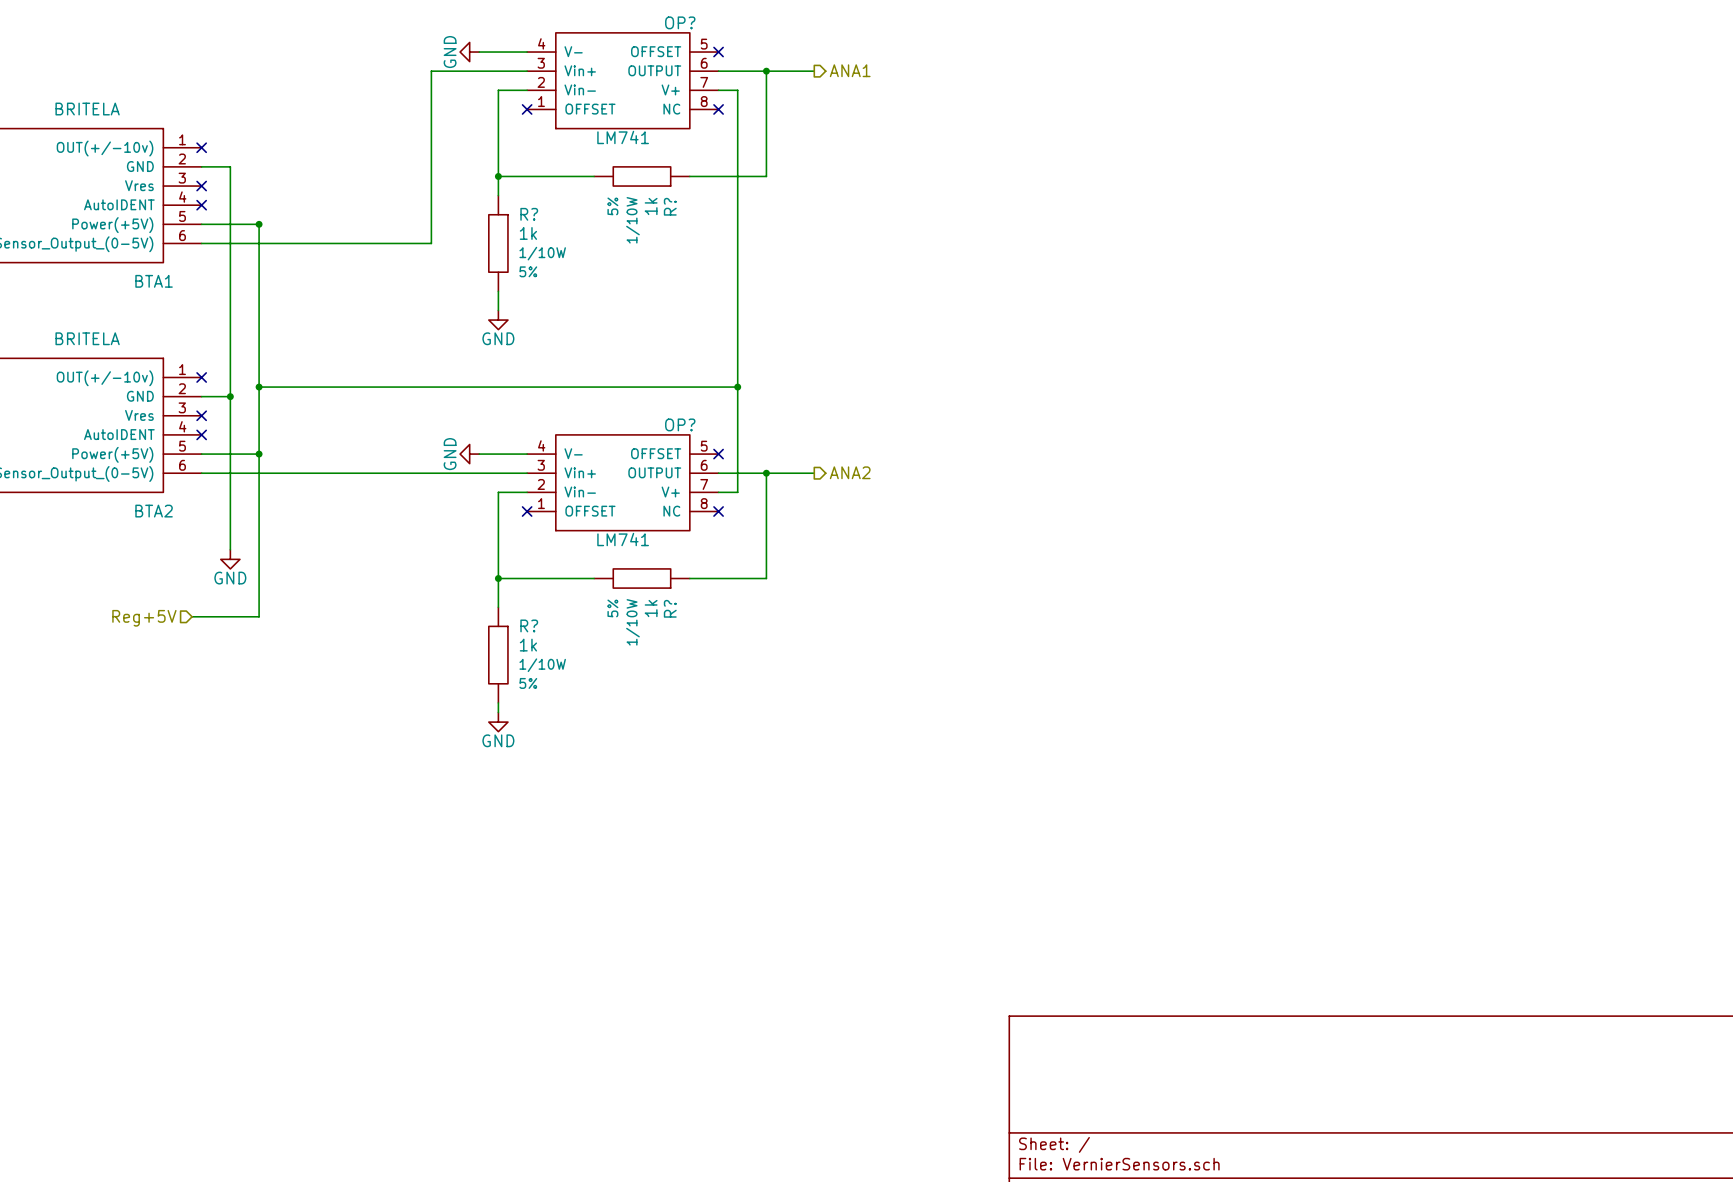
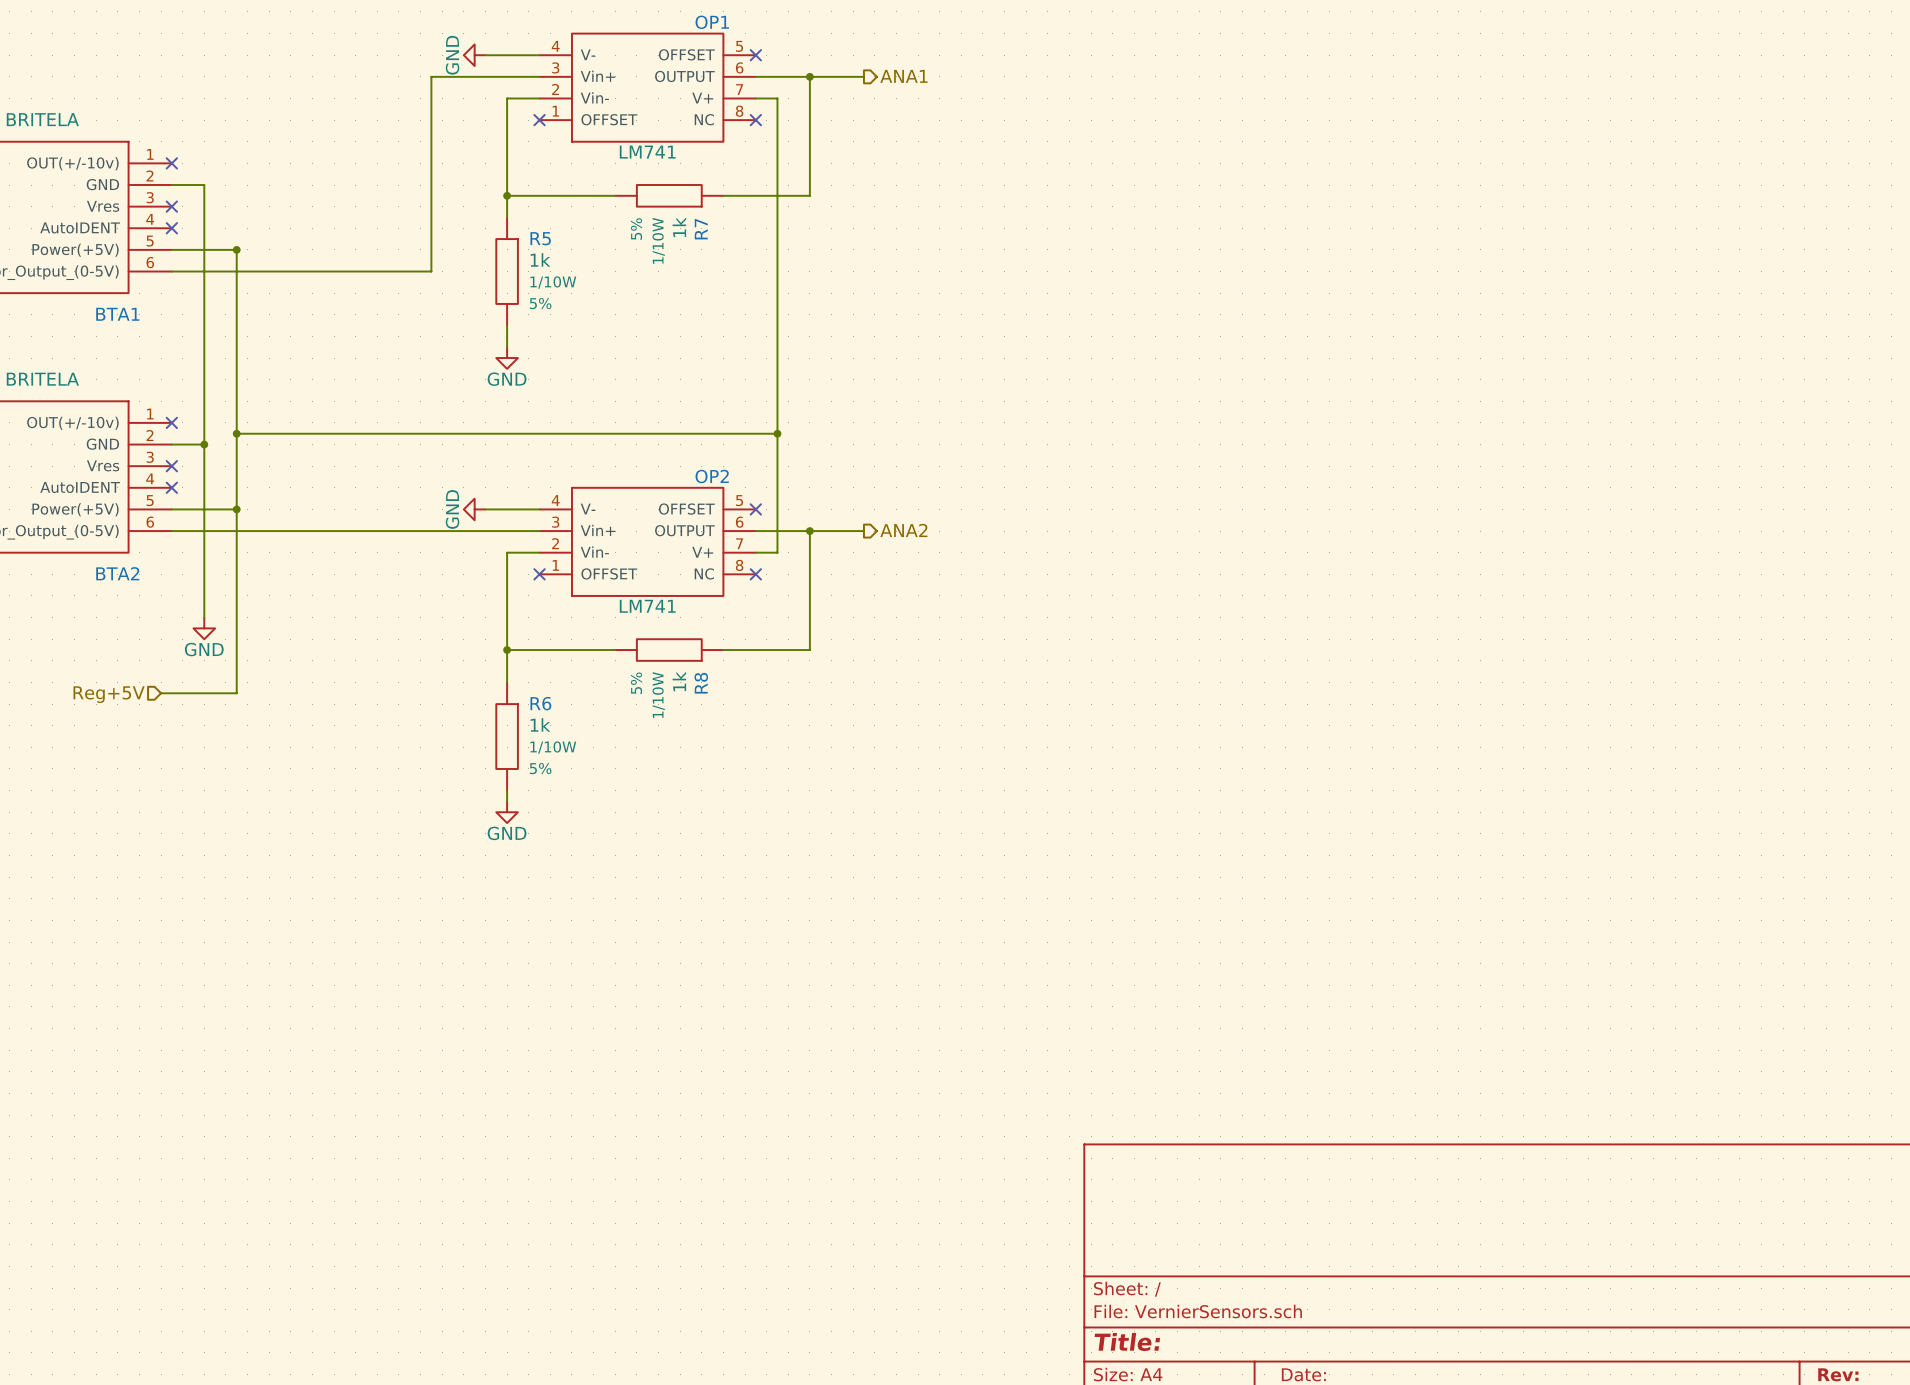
OP? name: OP? (680, 22) -> OP1 (712, 22)
R? name: R? (670, 206) -> R7 (701, 229)
R? name: R? (529, 214) -> R5 (540, 238)
OP? name: OP? (680, 424) -> OP2 (712, 476)
R? name: R? (670, 608) -> R8 (701, 683)
R? name: R? (529, 625) -> R6 (540, 703)

